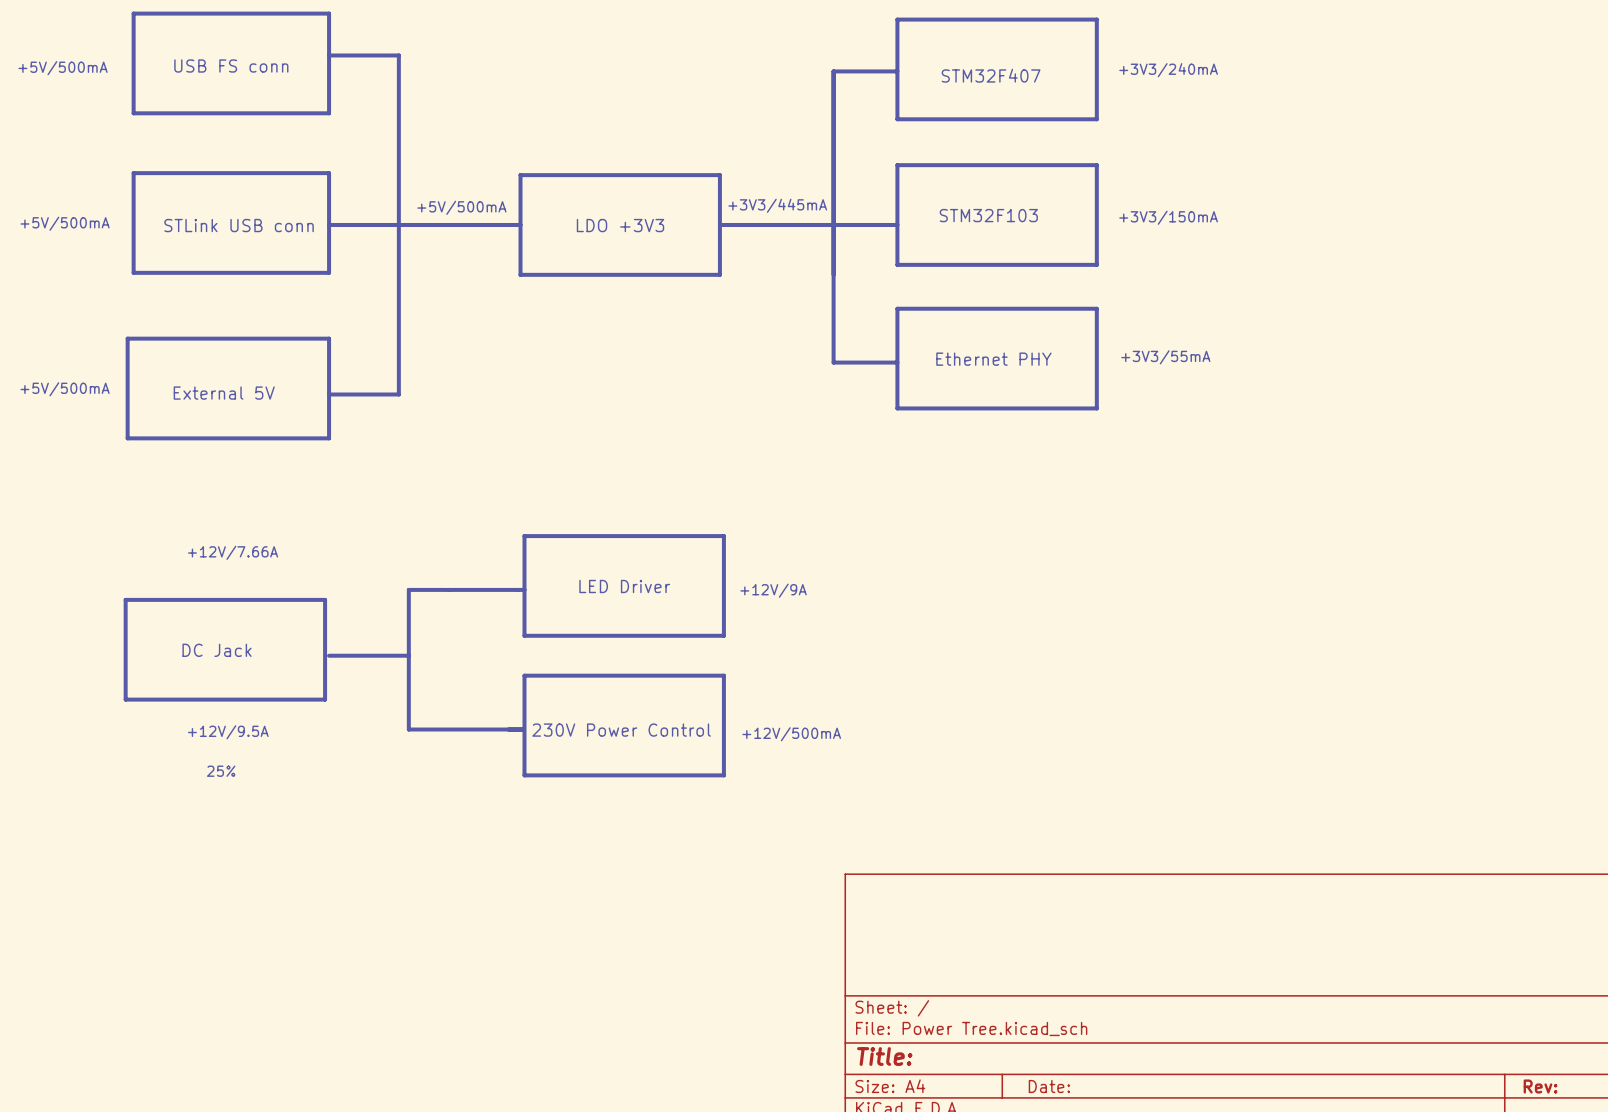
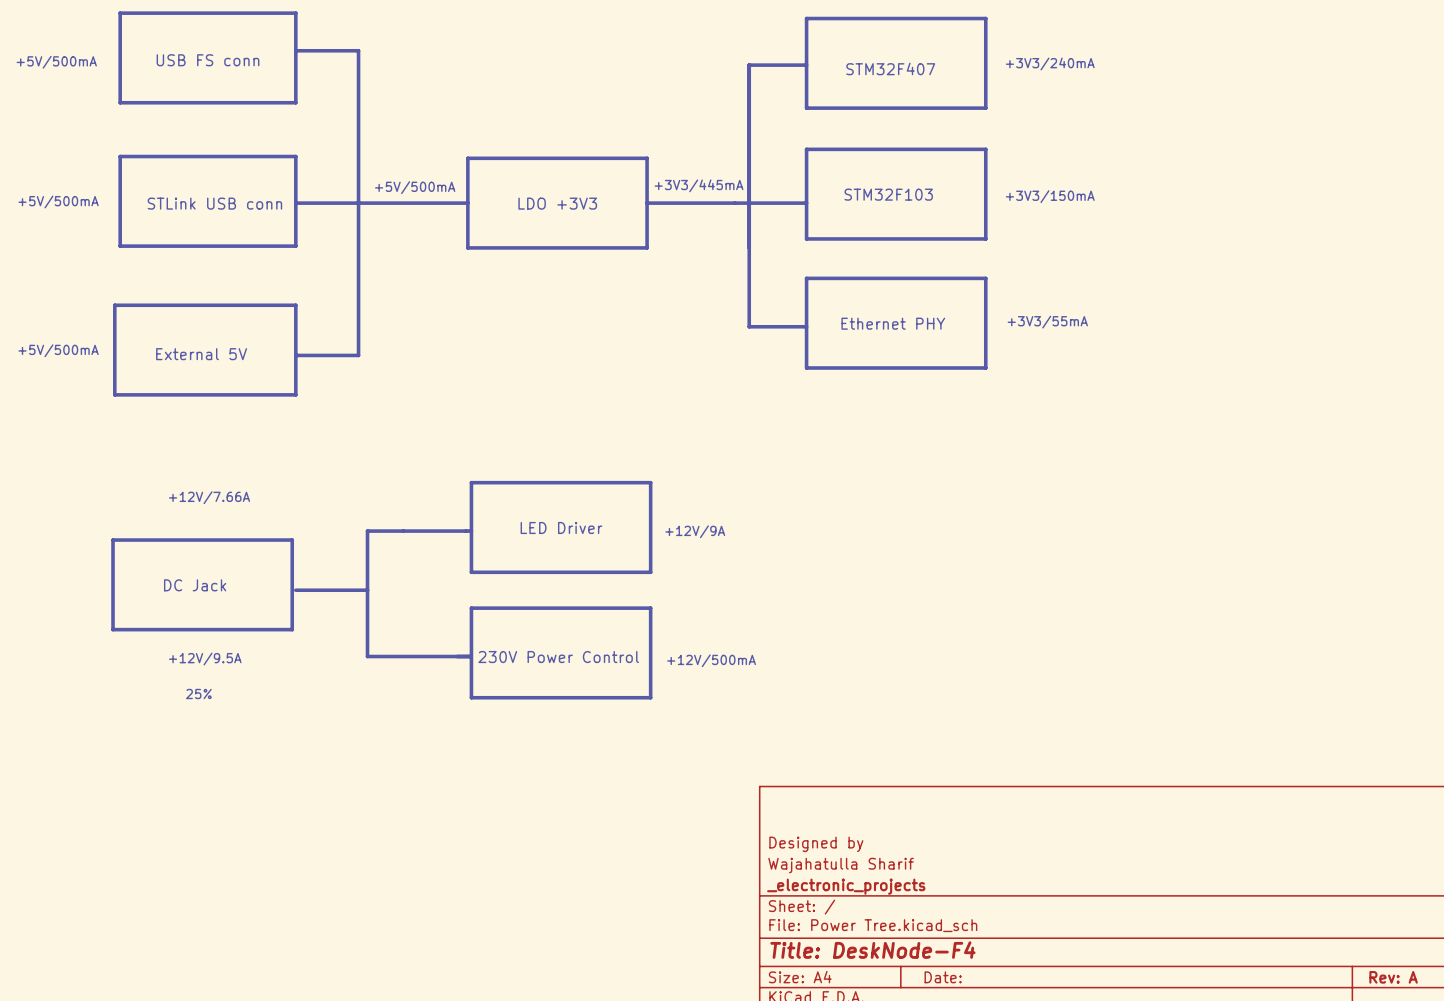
title block: none -> Designed by (816, 844)
title block: none -> Wajahatulla Sharif (841, 865)
title block: none -> _electronic_projects (846, 886)
title block: Title: (884, 1056) -> Title: DeskNode-F4 (872, 950)
title block: Rev: (1540, 1086) -> Rev: A (1393, 977)

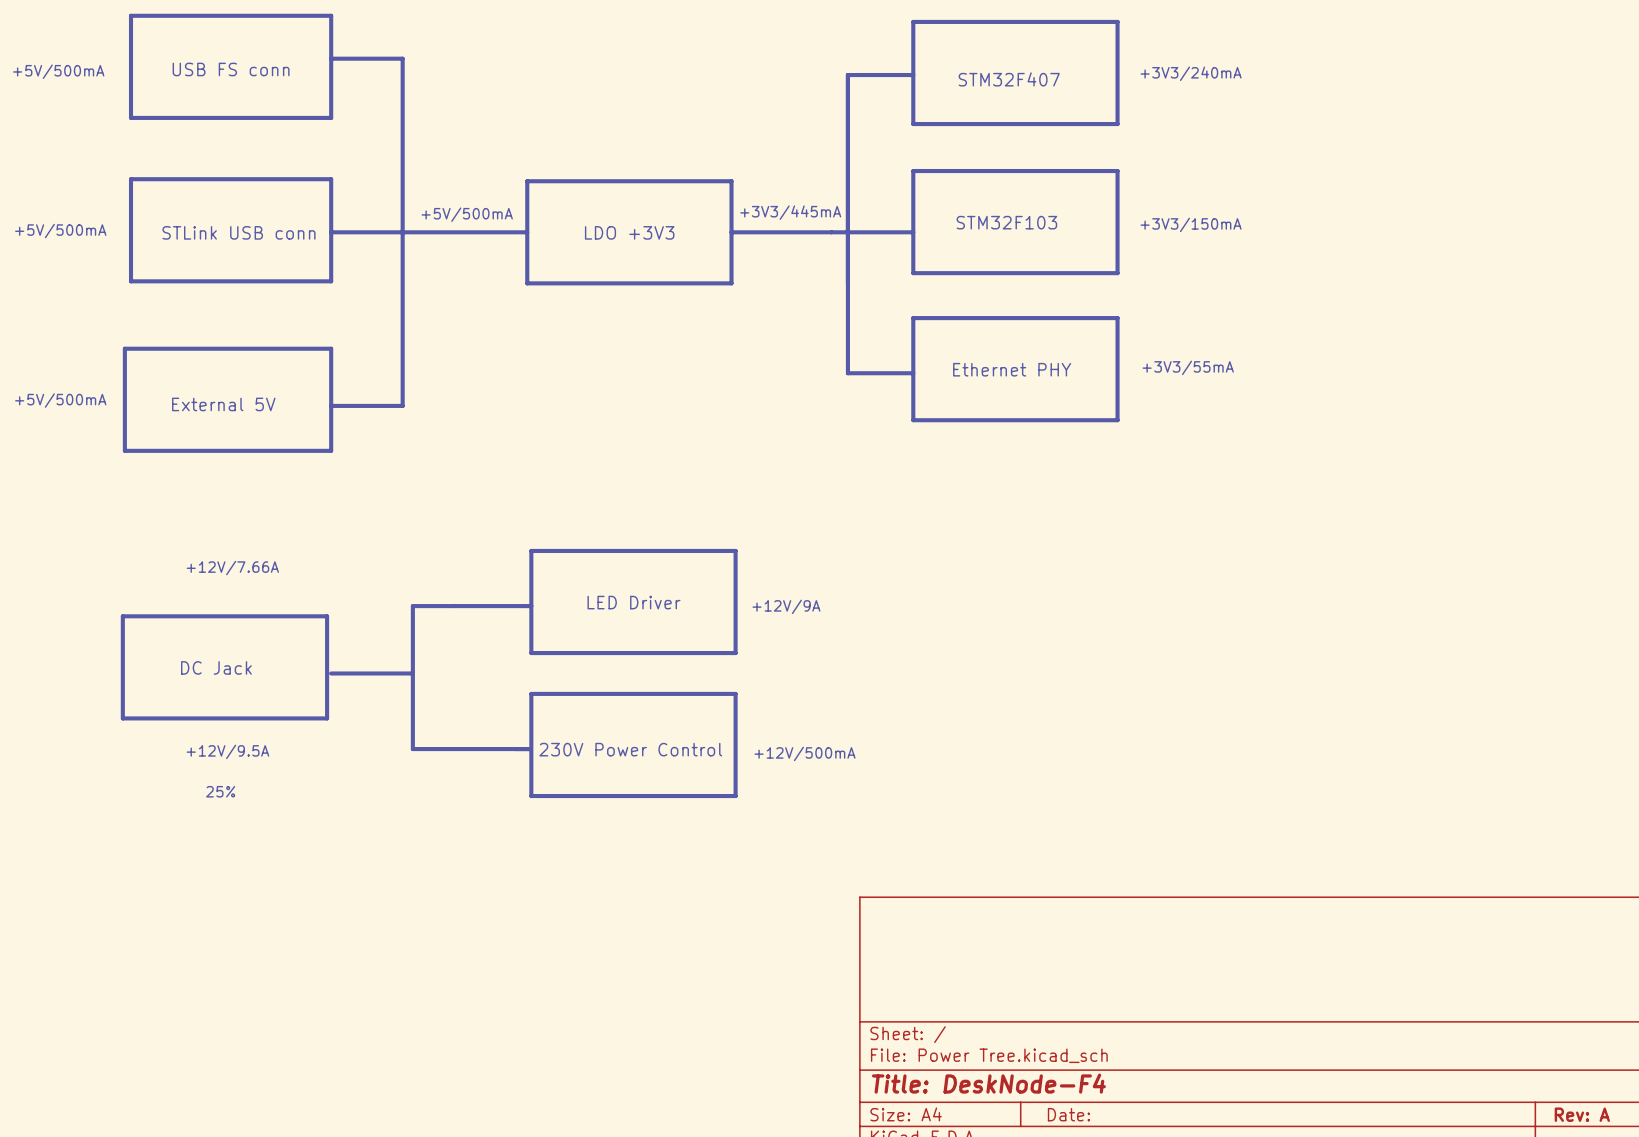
title block: Designed by (816, 844) -> none
title block: Wajahatulla Sharif (841, 865) -> none
title block: _electronic_projects (846, 886) -> none

